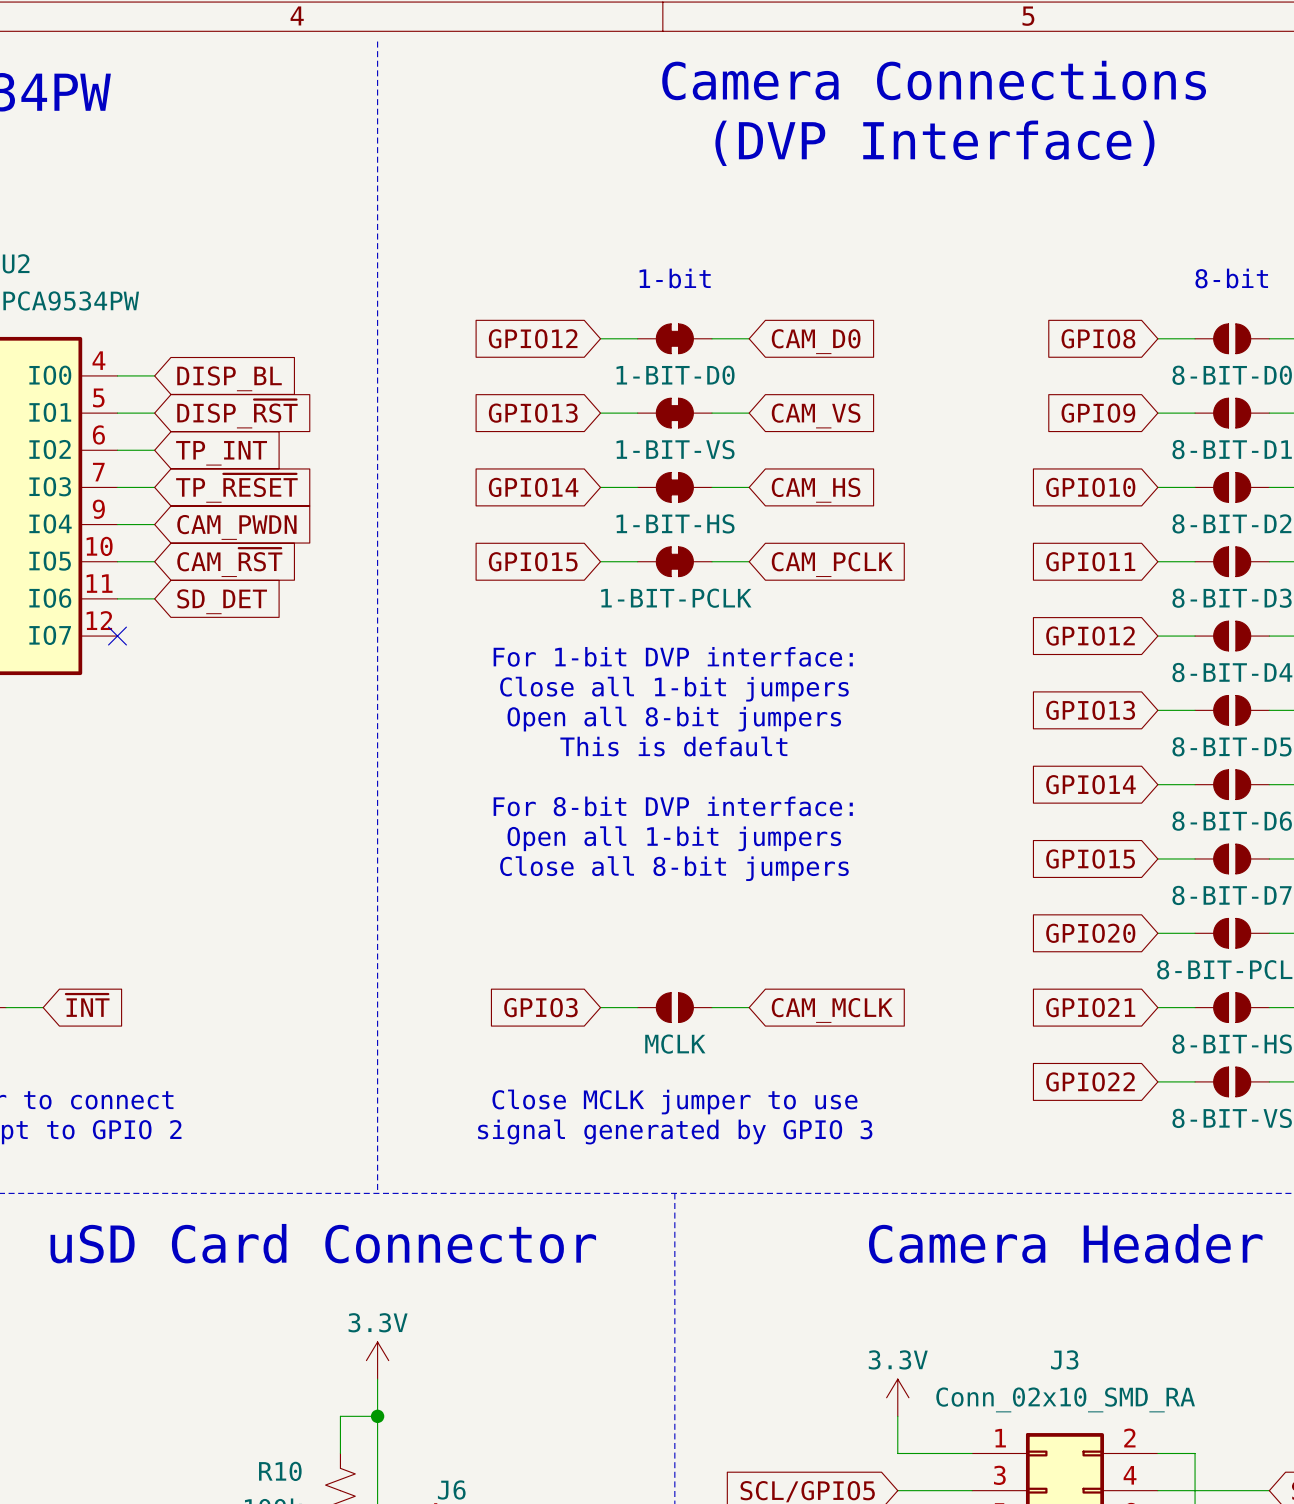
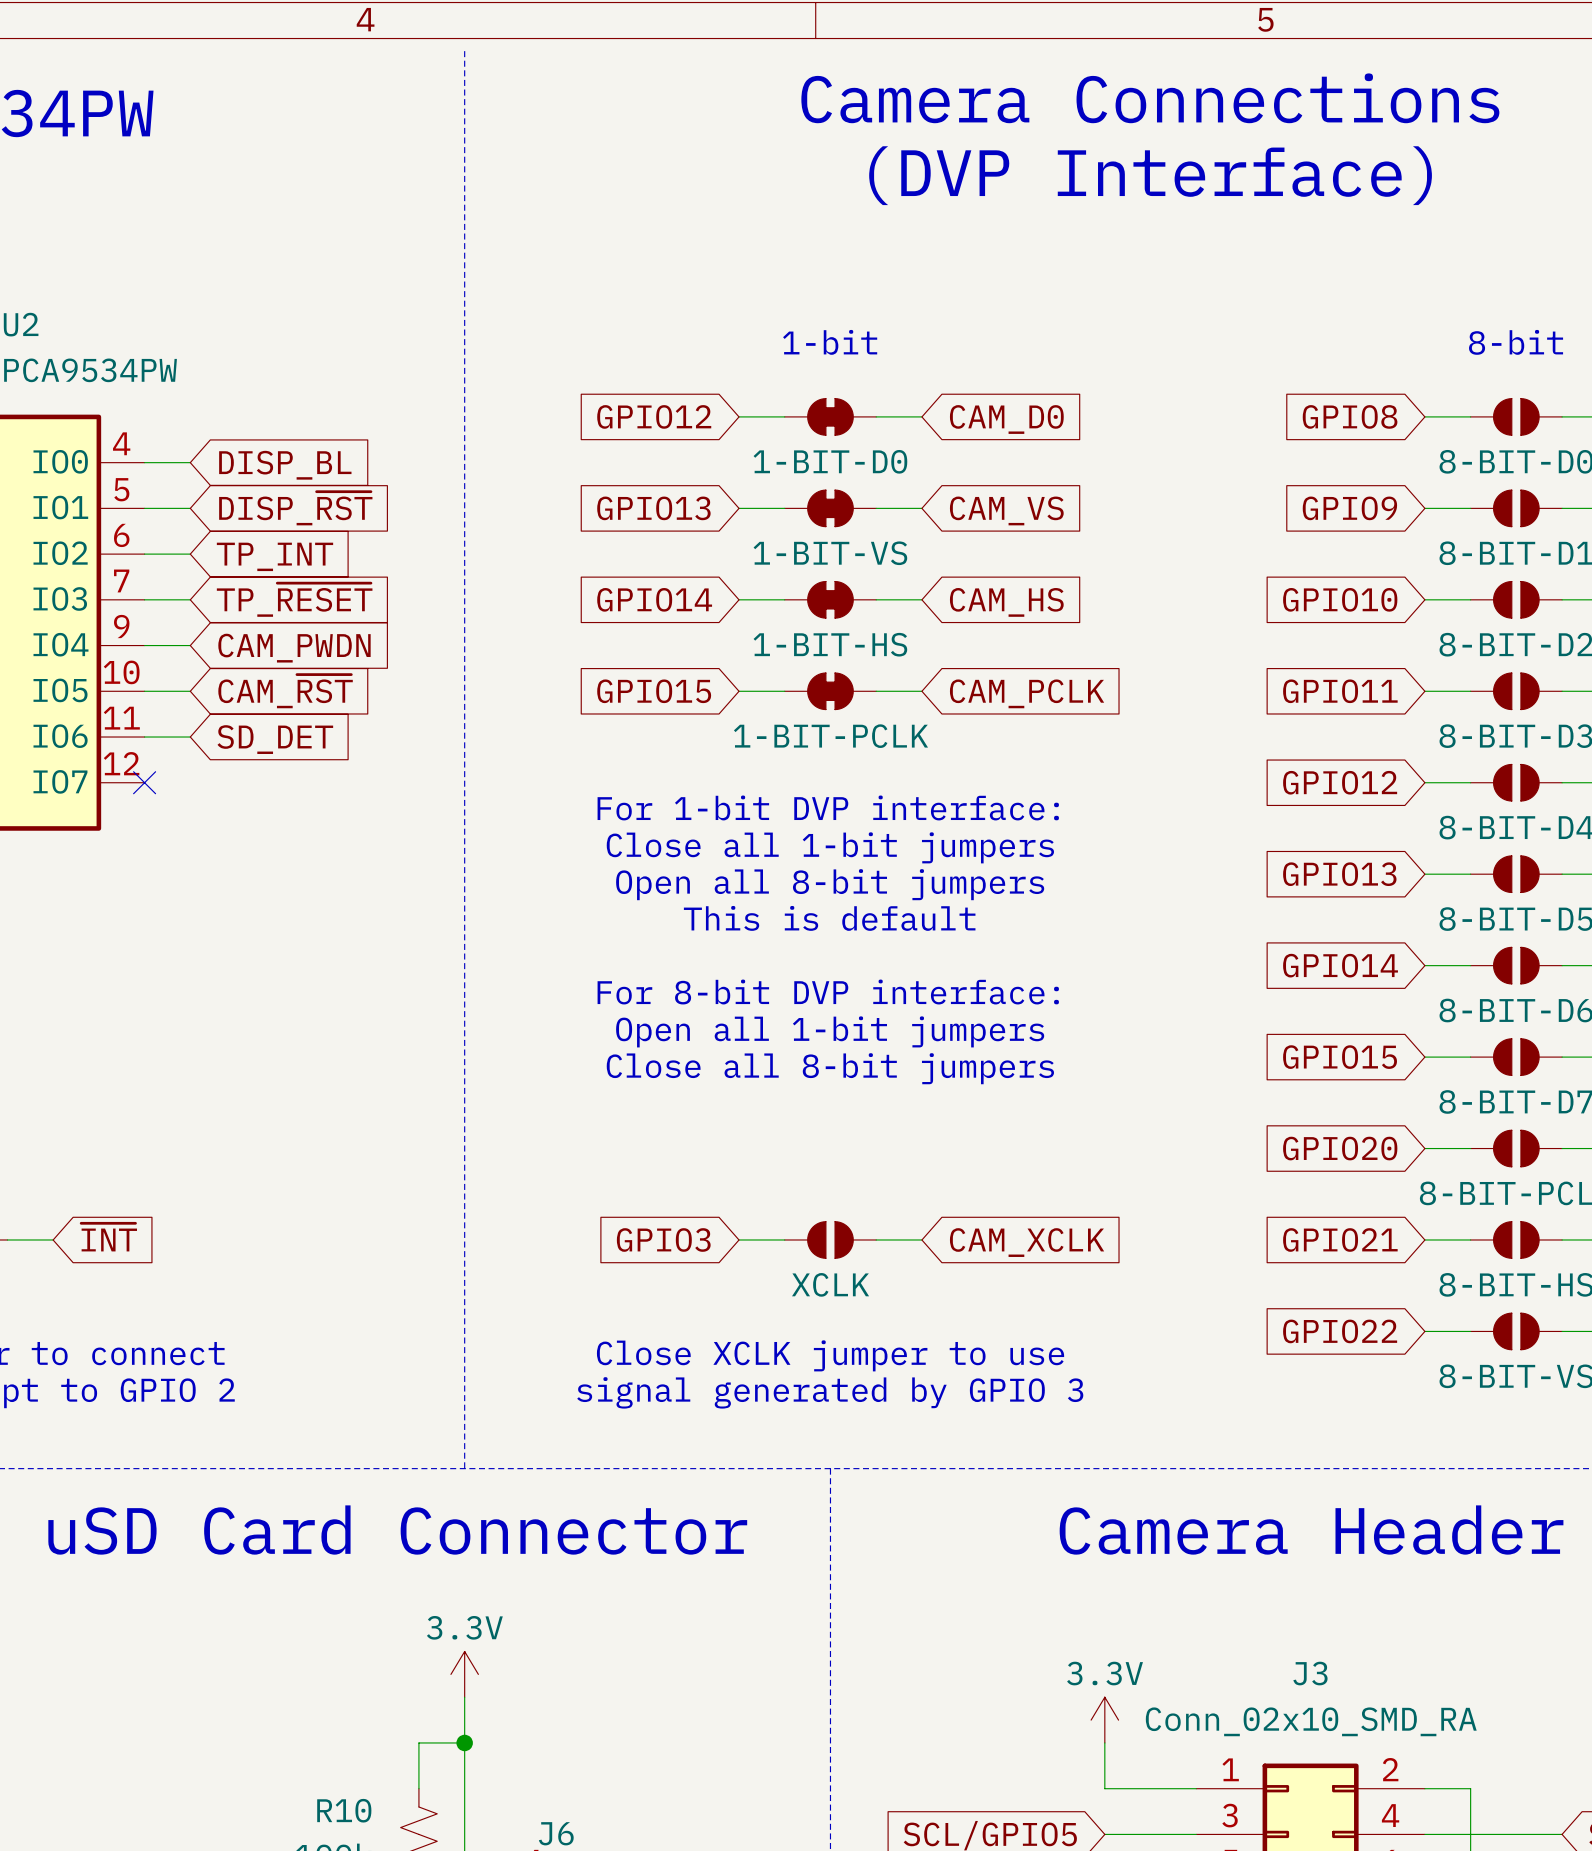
global label: CAM_MCLK (832, 1010) -> CAM_XCLK (1027, 1242)
part value: MCLK (675, 1044) -> XCLK (830, 1284)
text: Close MCLK jumper to use (674, 1101) -> Close XCLK jumper to use (830, 1355)

